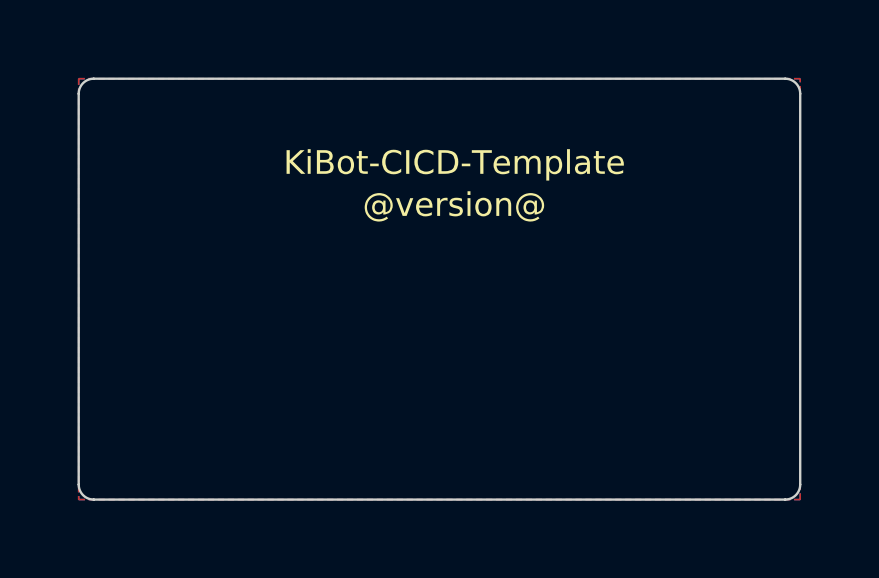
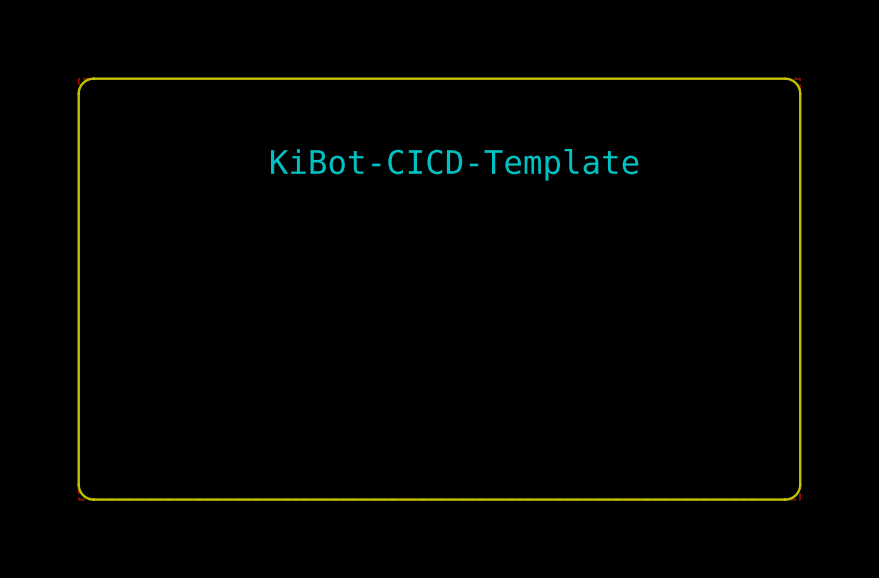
text: @version@ (454, 206) -> none

